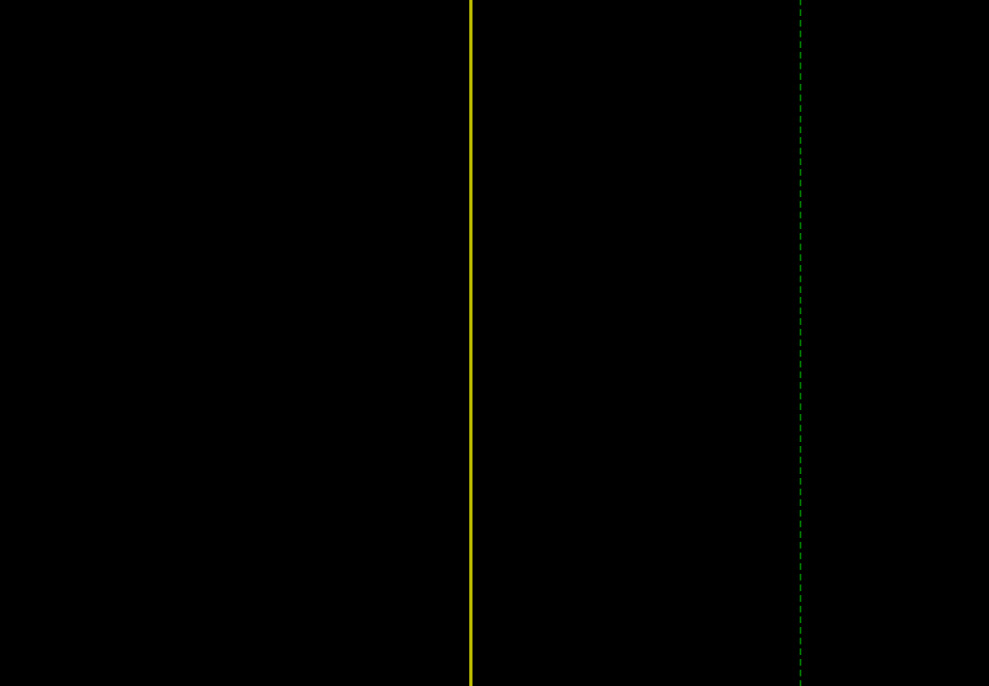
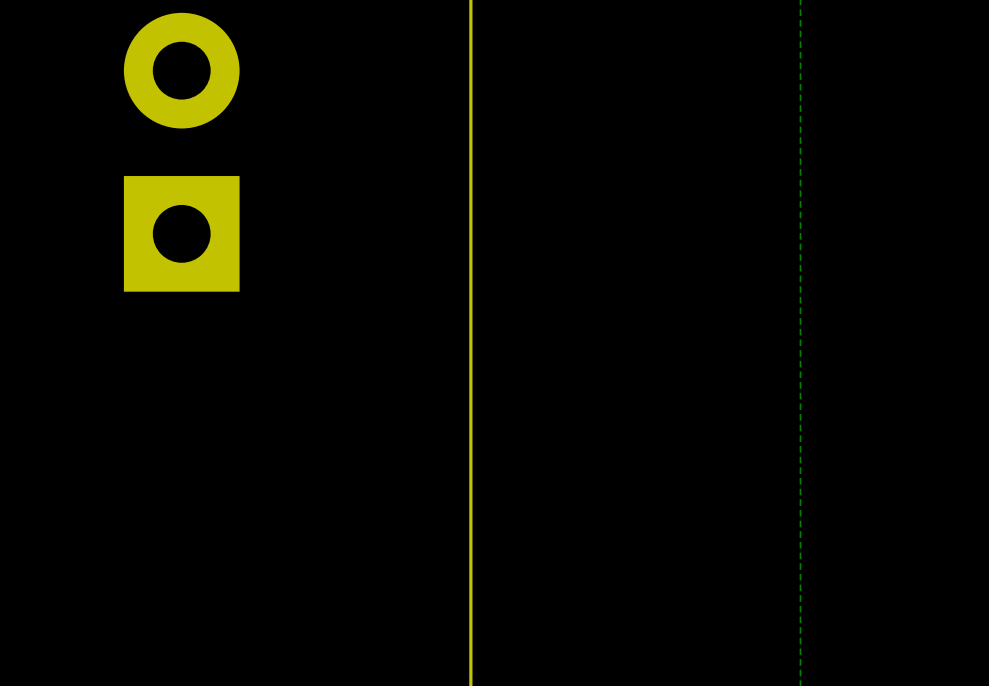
part: none -> (181, 152)

